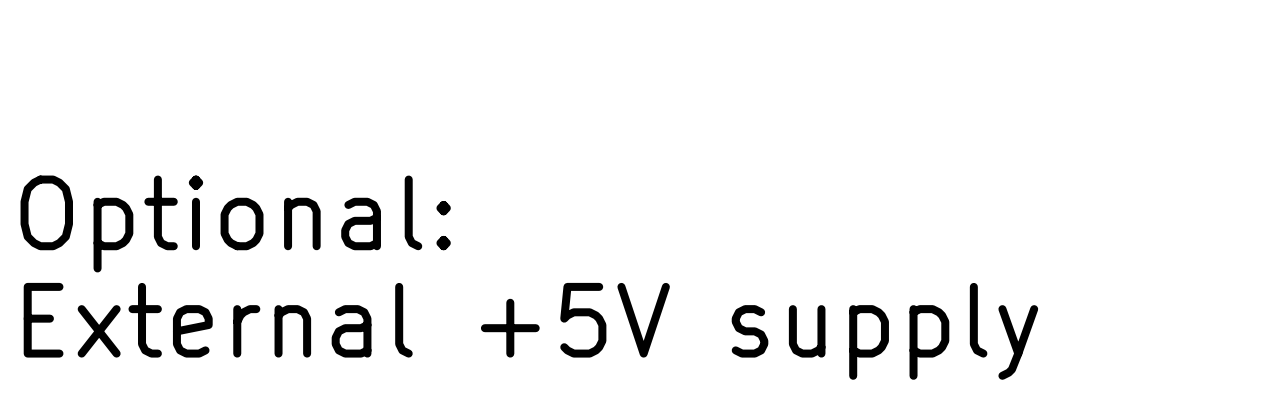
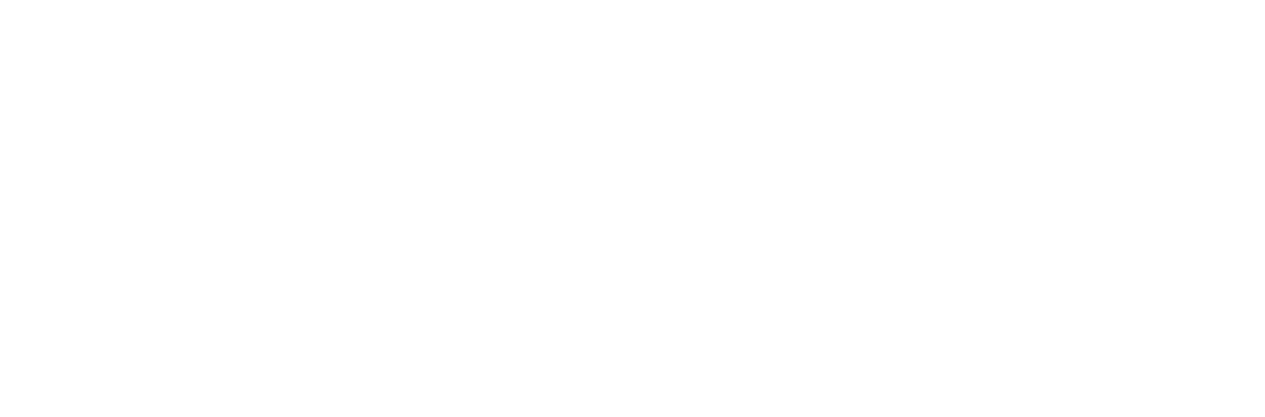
text: Optional: (235, 224) -> none
text: External +5V supply (530, 331) -> none

